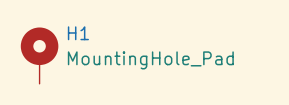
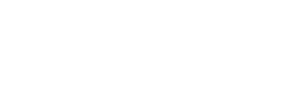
H1: MountingHole_Pad (39, 55) -> none

